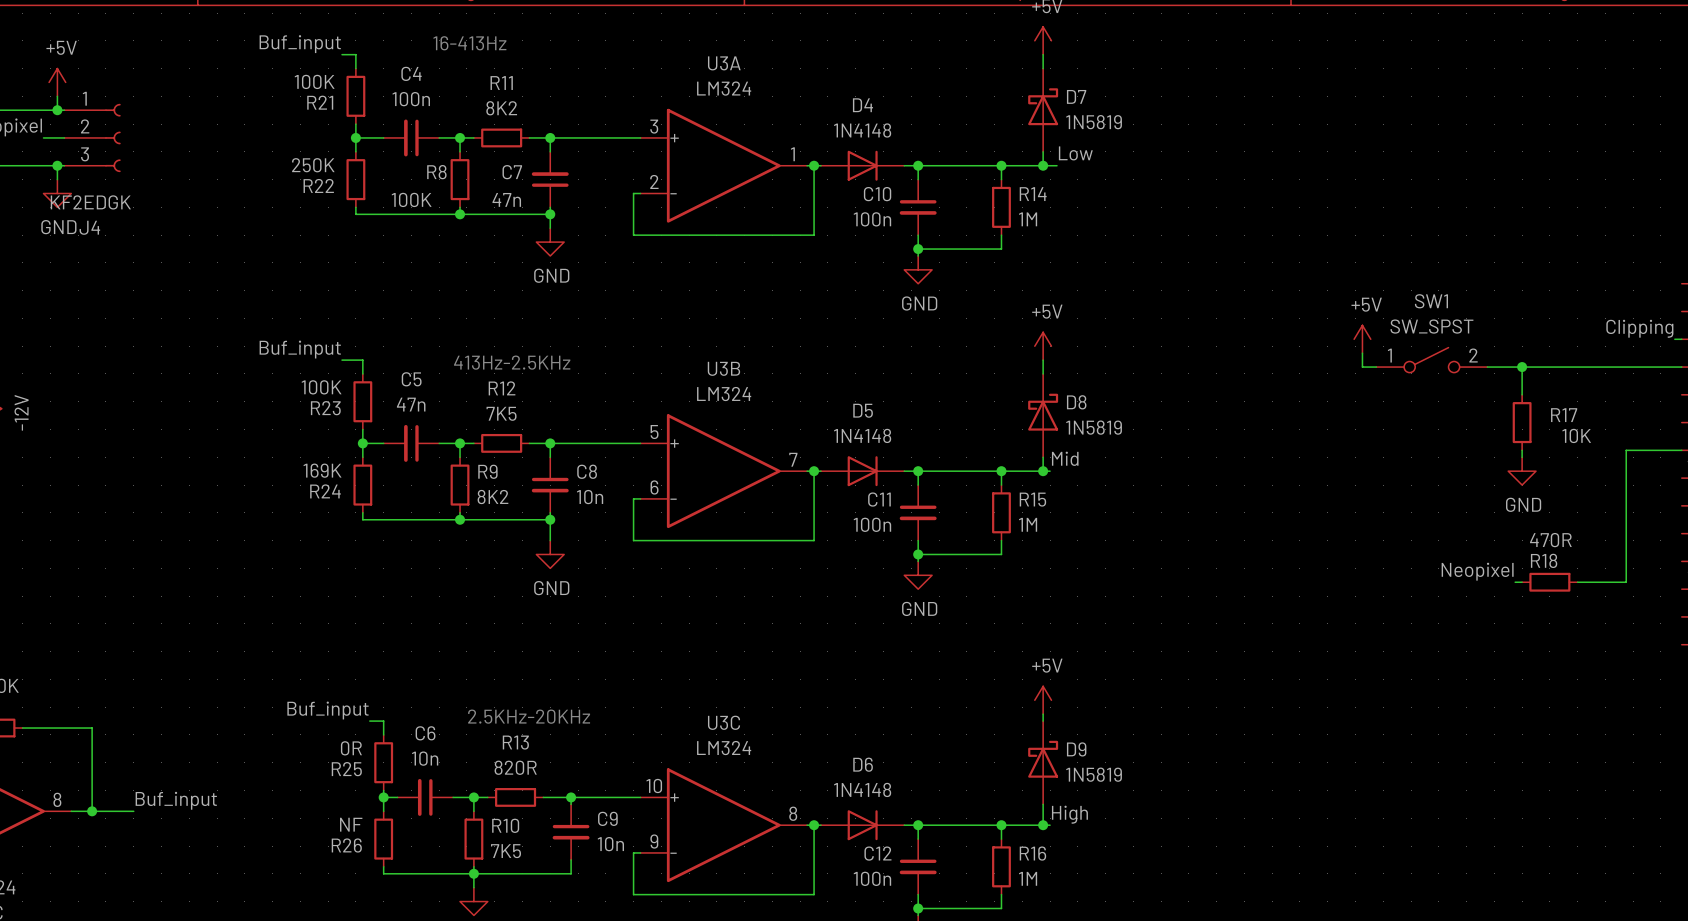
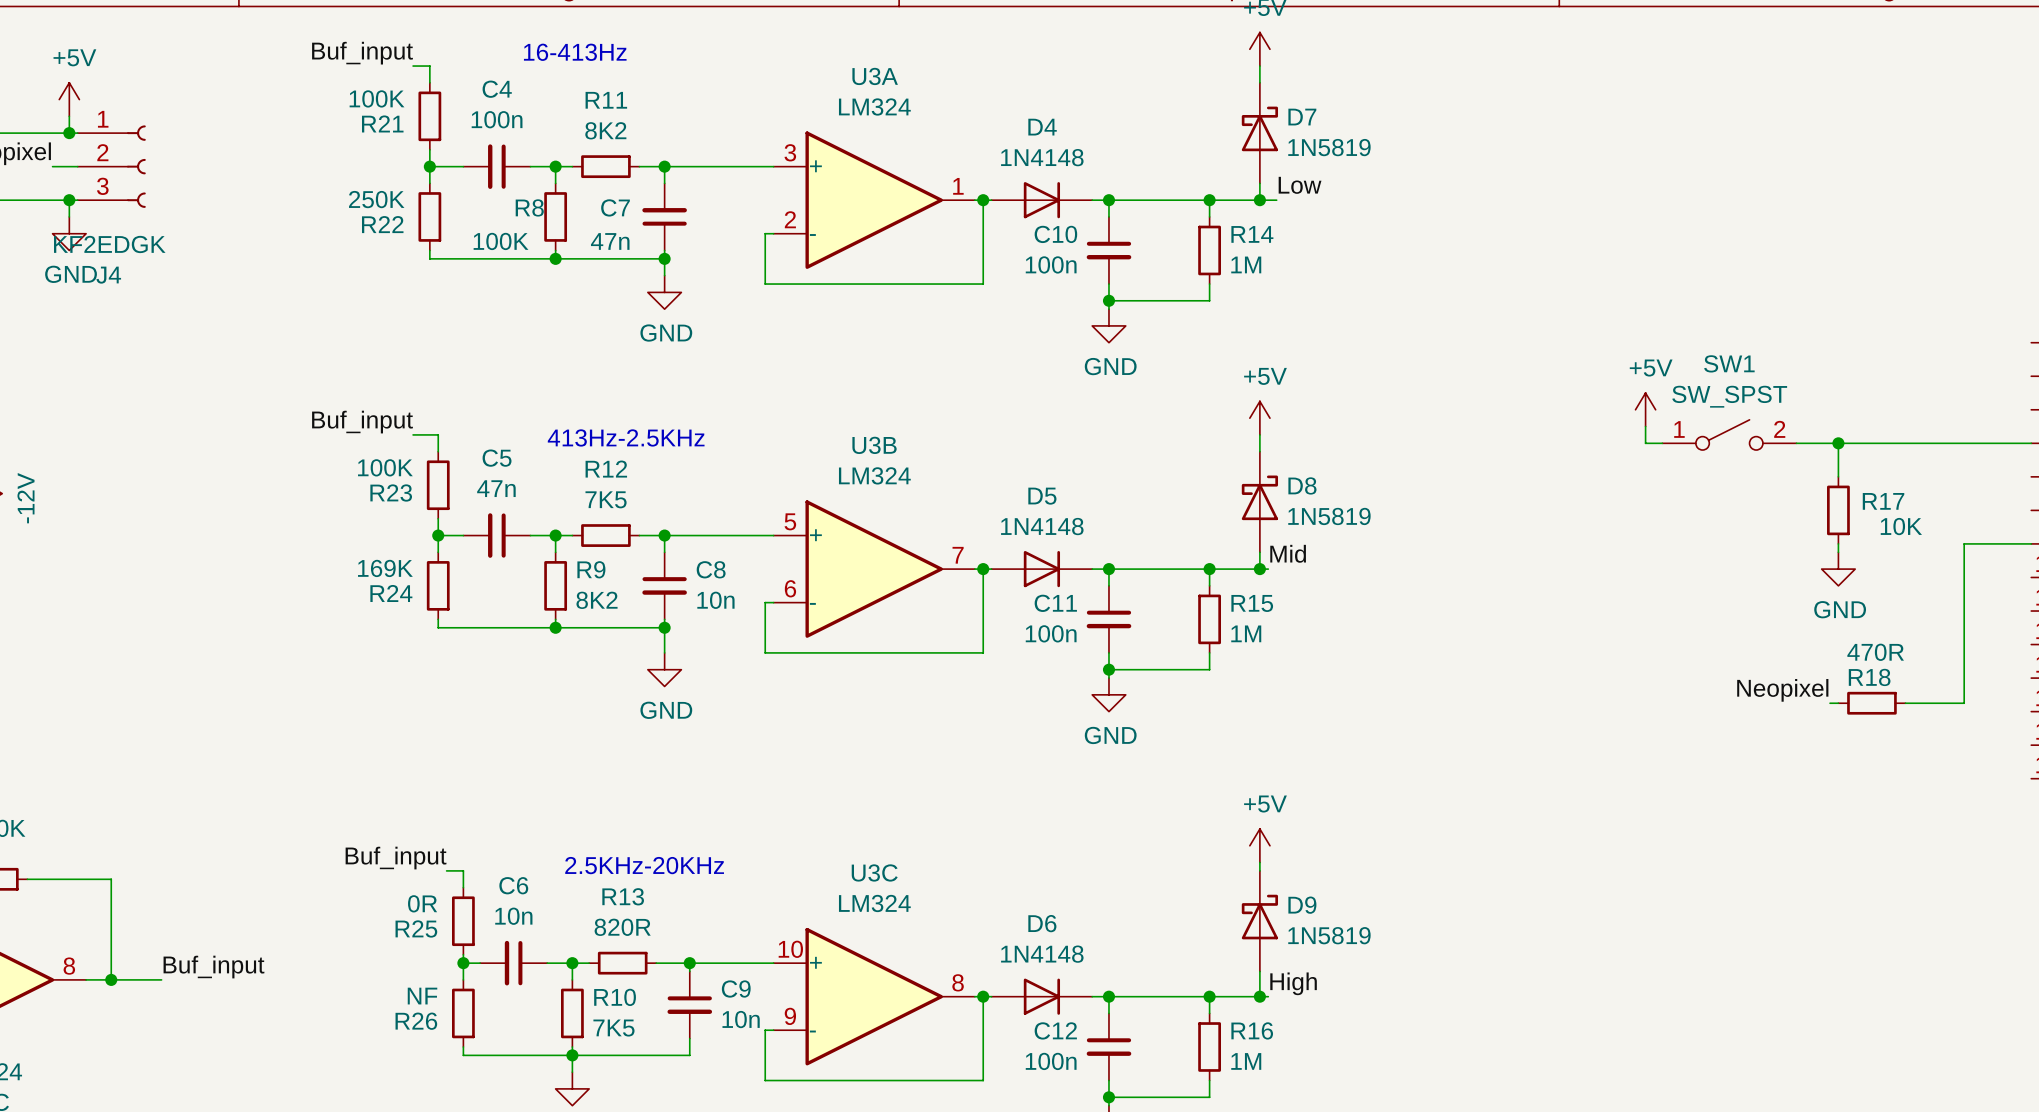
label: Clipping (1639, 328) -> none
wire: (1674, 339) (1681, 339) -> none

